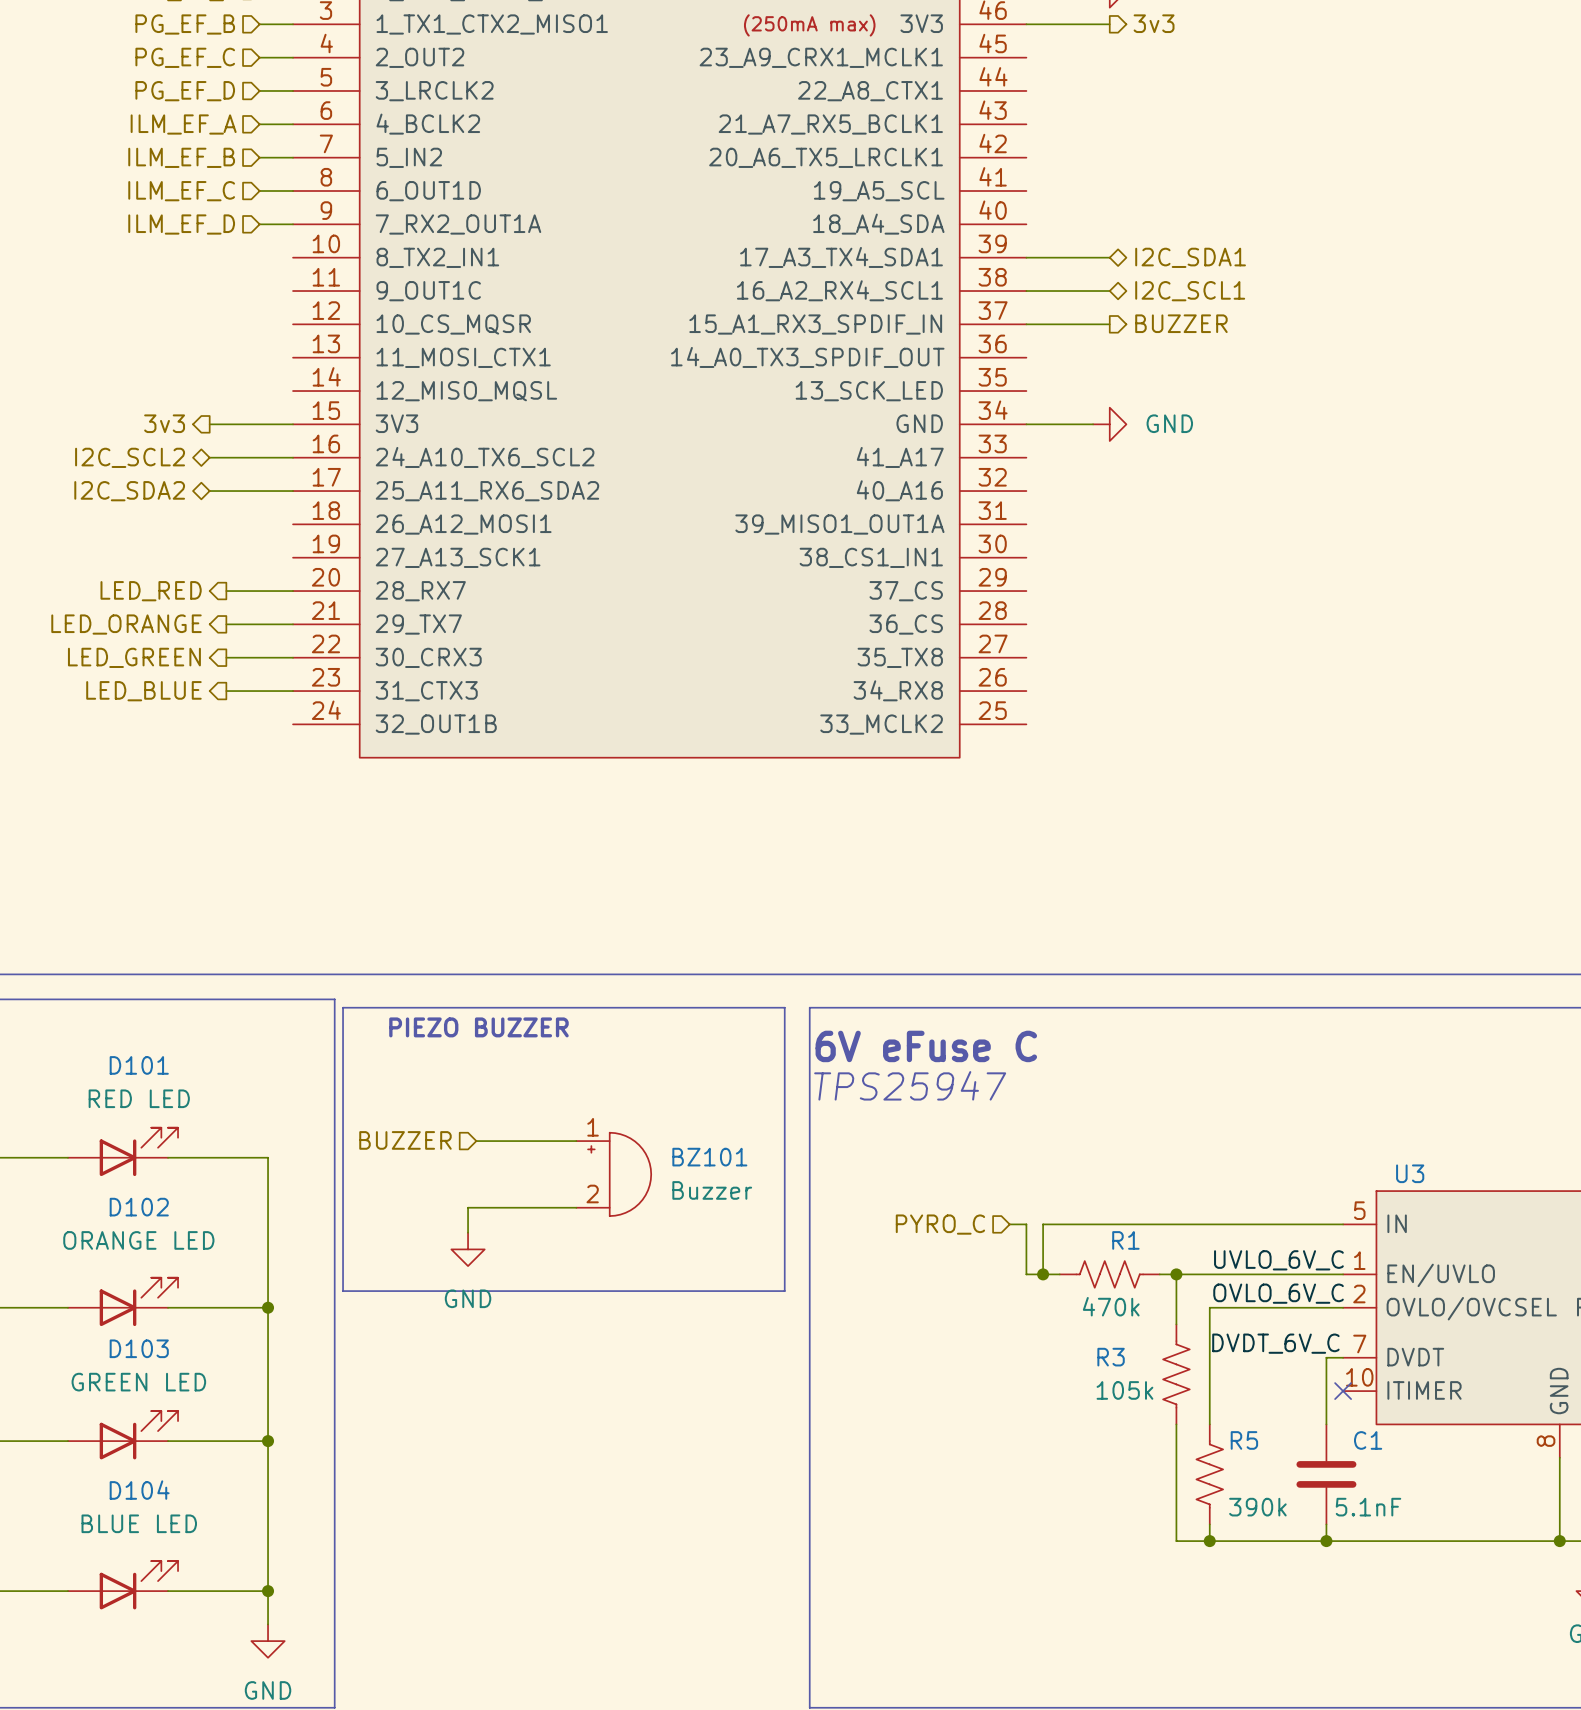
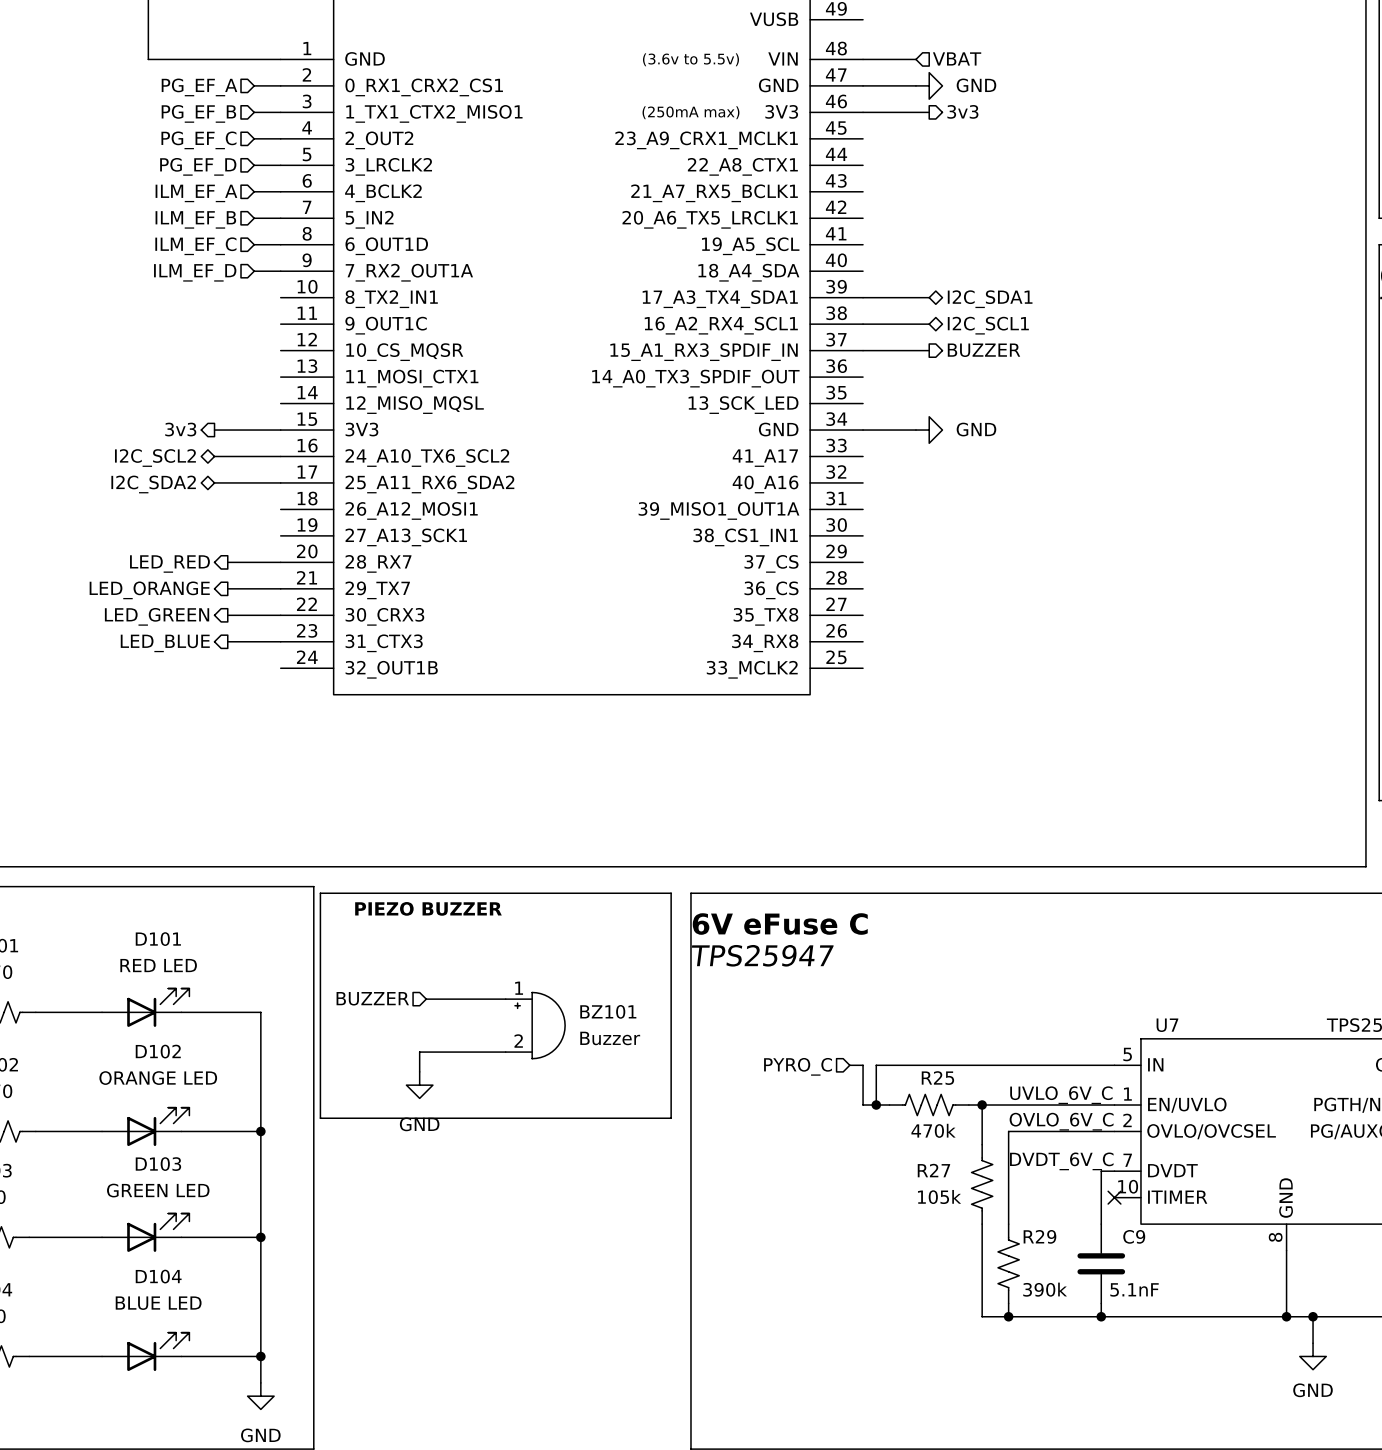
U3 name: U3 (1410, 1173) -> U7 (1167, 1025)
R1 name: R1 (1125, 1240) -> R25 (937, 1078)
R3 name: R3 (1111, 1357) -> R27 (933, 1170)
R5 name: R5 (1244, 1440) -> R29 (1039, 1236)
C1 name: C1 (1368, 1440) -> C9 (1134, 1236)

